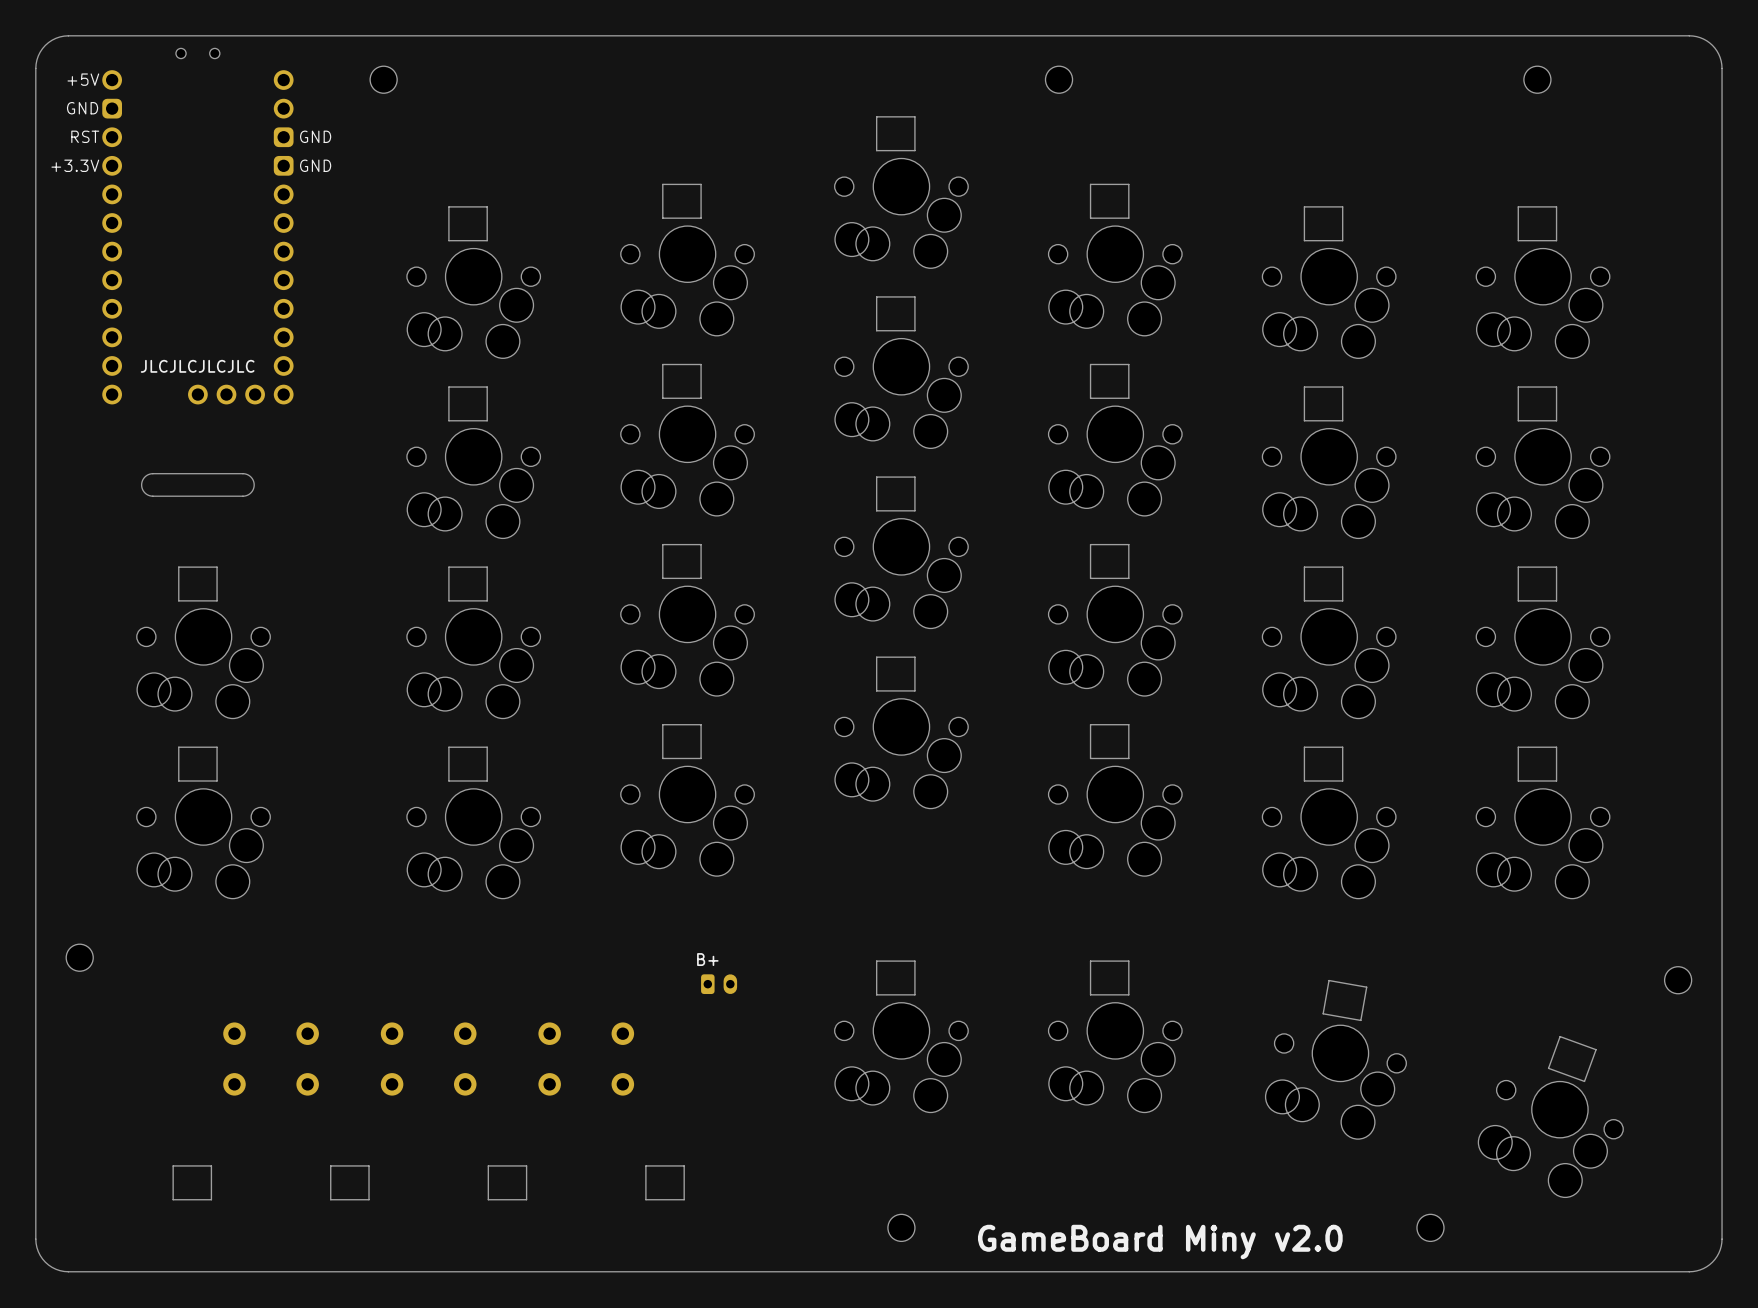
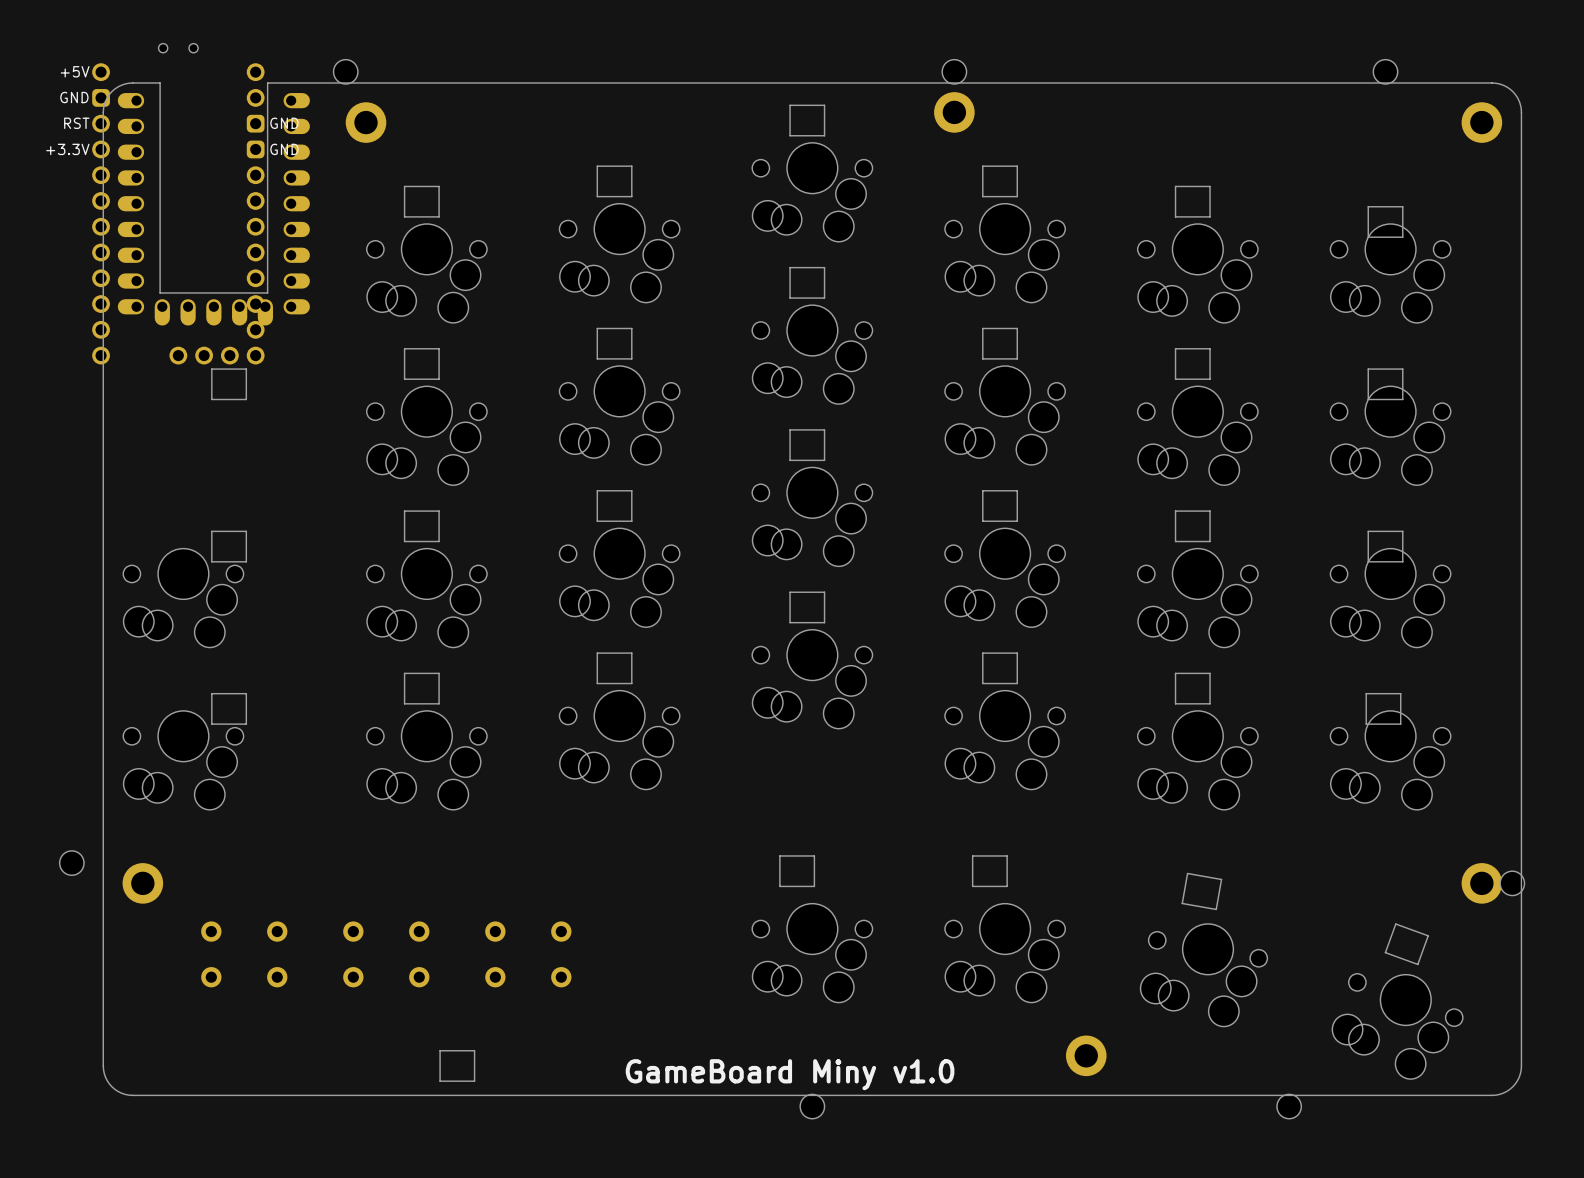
board edge: (68, 35) (1689, 35) (1700, 37) (1709, 42) (1718, 54) (1722, 68) (1722, 1239) (1720, 1249) (1714, 1259) (1703, 1268) (1689, 1271) (68, 1271) (60, 1270) (48, 1265) (38, 1251) (35, 1239) (35, 68) (38, 55) (45, 45) (55, 38) (68, 35) -> (132, 83) (121, 85) (111, 91) (105, 101) (103, 112) (103, 1065) (105, 1077) (114, 1089) (132, 1095) (1492, 1095) (1504, 1092) (1515, 1084) (1519, 1075) (1521, 1065) (1521, 112) (1518, 99) (1510, 89) (1501, 84) (1492, 83) (267, 83) (267, 292) (160, 292) (160, 83) (132, 83)
part: none -> (954, 112)
part: none -> (366, 122)
part: none -> (1481, 122)
part position: (1537, 223) -> (1385, 221)
part: none -> (213, 209)
text: JLCJLCJLCJLC (197, 366) -> none
part position: (1537, 403) -> (1385, 384)
part: none -> (229, 384)
board edge: (152, 473) (244, 473) (252, 478) (254, 486) (250, 493) (244, 496) (151, 496) (143, 491) (141, 484) (144, 476) (152, 473) -> none
part position: (197, 584) -> (229, 546)
part position: (1537, 584) -> (1385, 546)
part position: (197, 764) -> (229, 708)
part position: (1537, 764) -> (1383, 708)
part position: (895, 977) -> (797, 871)
part position: (1109, 977) -> (989, 871)
part: none -> (142, 883)
part: none -> (1481, 883)
part: (719, 984) -> none
part position: (1344, 1000) -> (1201, 891)
part position: (1572, 1059) -> (1406, 944)
part: none -> (1086, 1055)
part: (192, 1182) -> none
part: (349, 1182) -> none
part: (665, 1182) -> none
text: none -> GameBoard Miny v1.0 (790, 1074)
text: GameBoard Miny v2.0 (1160, 1242) -> none

